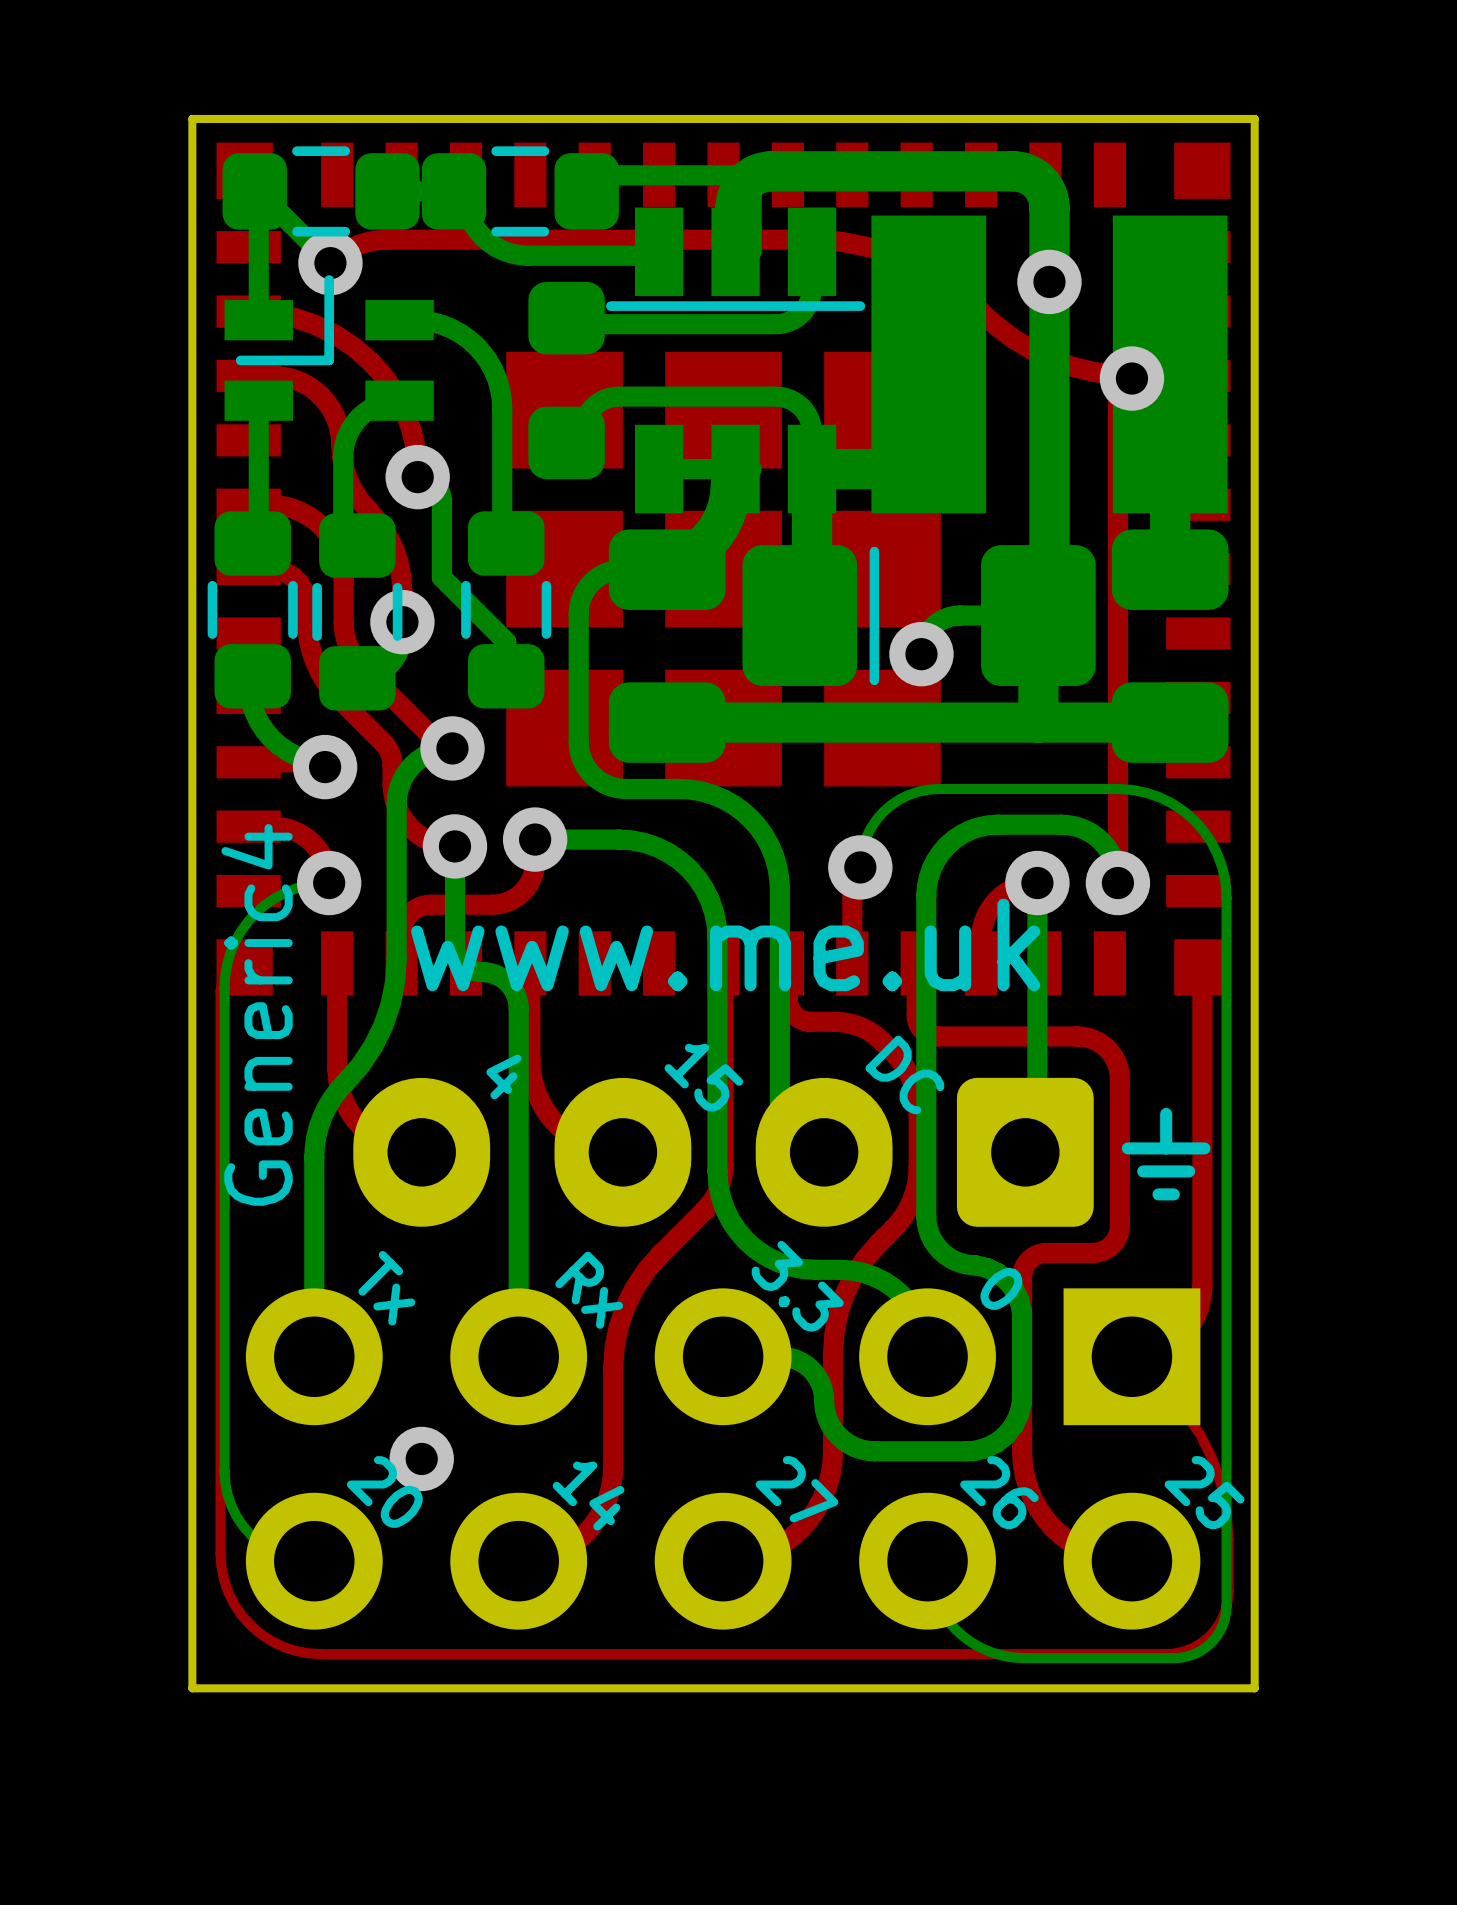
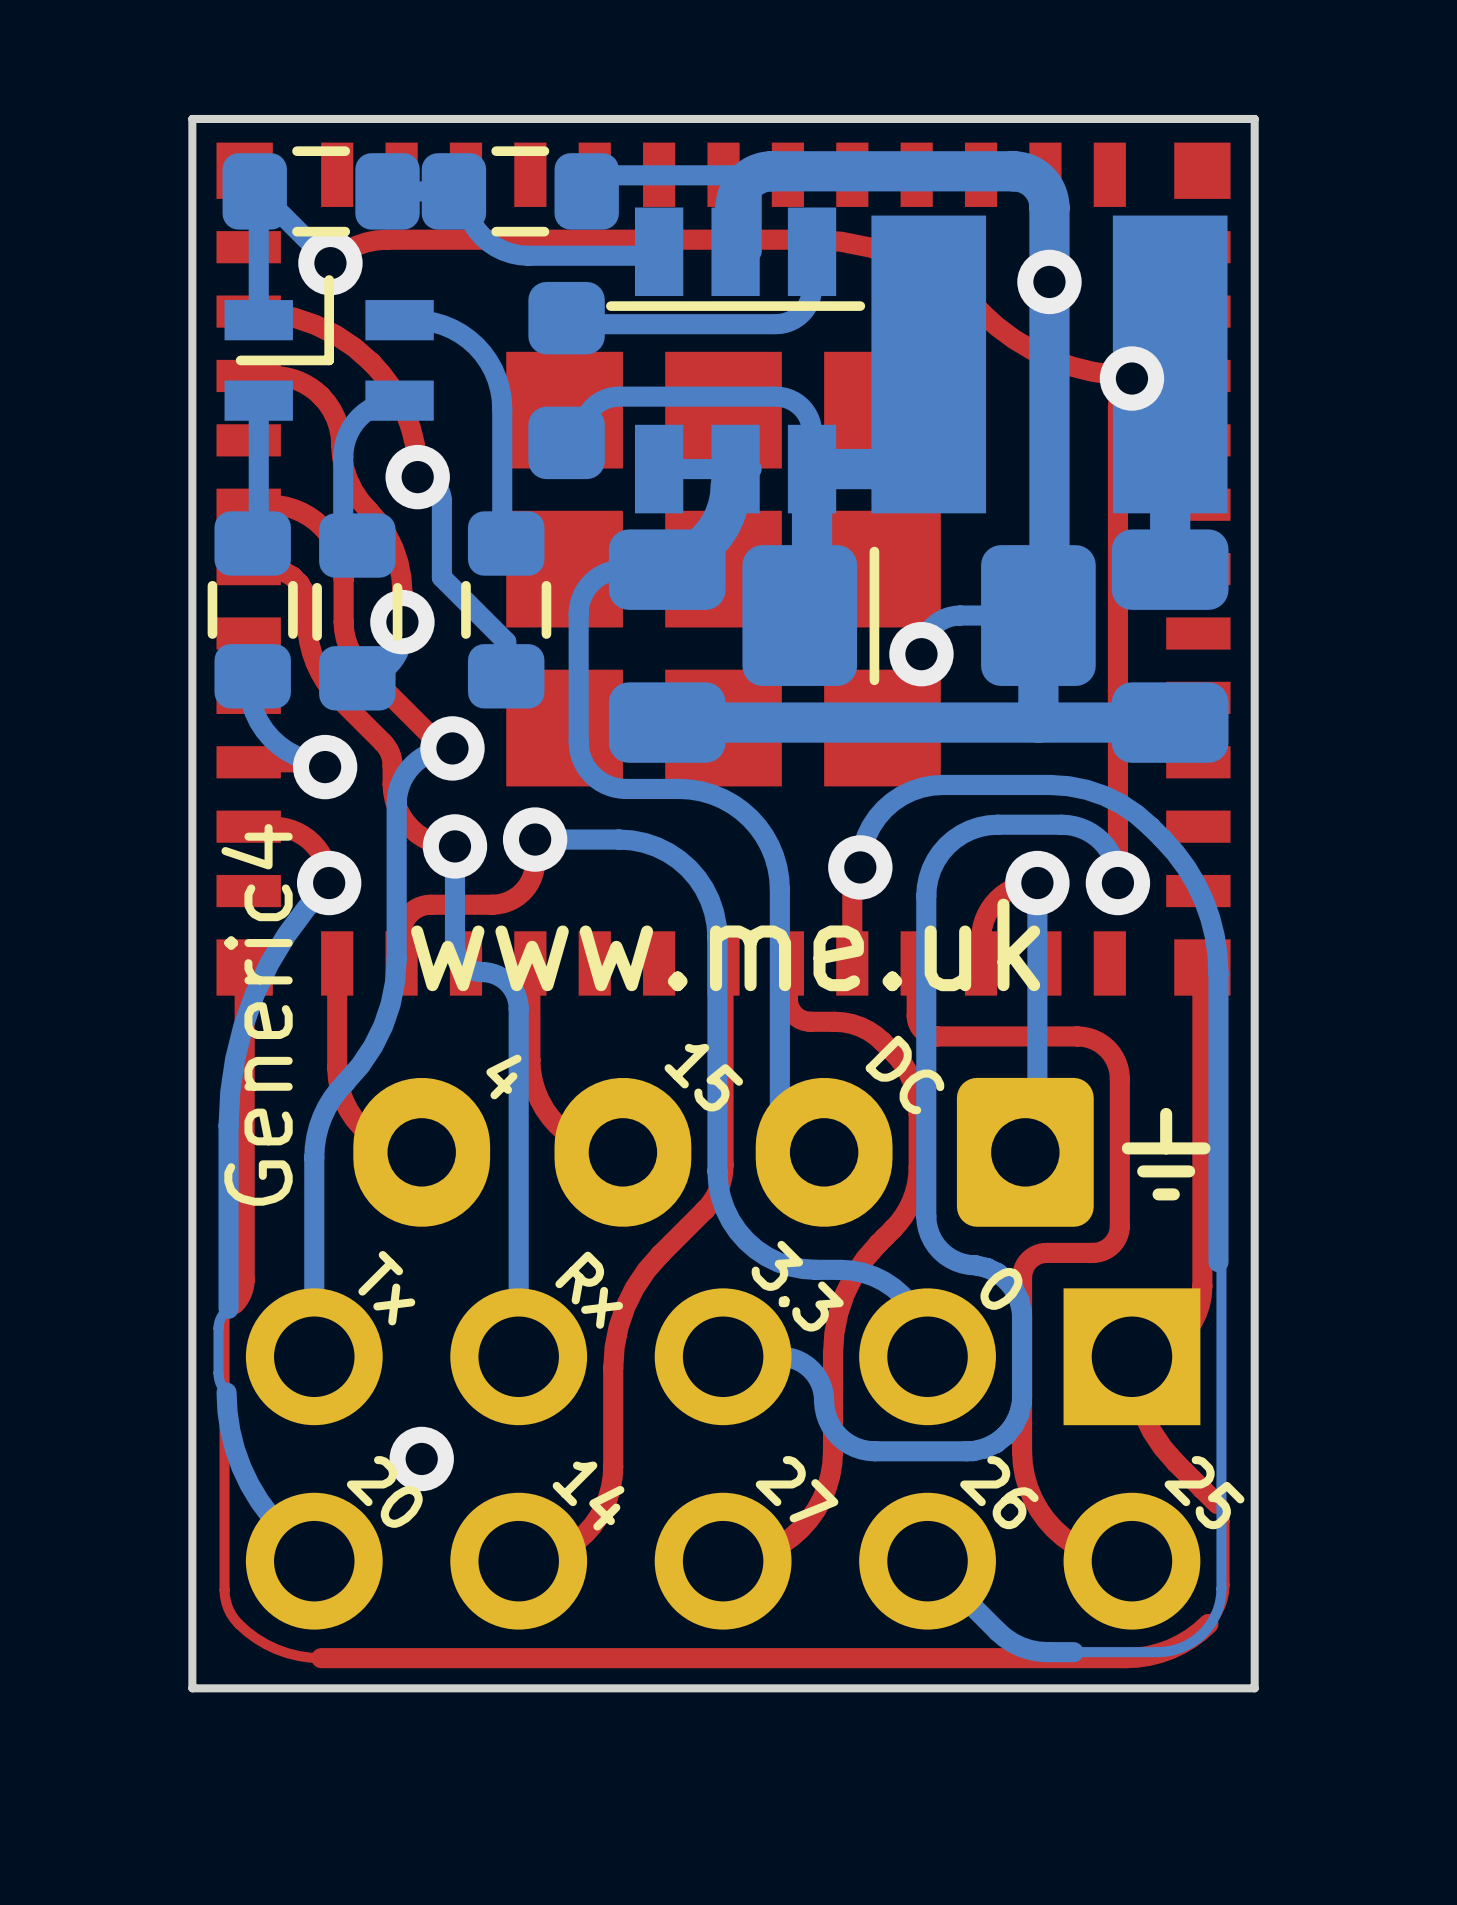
bottom track: (860, 867) (866, 837) (876, 819) (891, 805) (918, 791) (938, 788) (1117, 788) (1146, 792) (1172, 803) (1184, 811) (1194, 820) (1211, 843) (1222, 869) (1225, 883) (1226, 1605) (1222, 1625) (1215, 1637) (1206, 1647) (1194, 1654) (1181, 1657) (1024, 1658) (1002, 1655) (972, 1643) (948, 1621) (932, 1593) (927, 1561) -> (860, 867) (863, 846) (871, 826) (884, 809) (911, 791) (942, 784) (1049, 784) (1086, 789) (1121, 804) (1136, 814) (1175, 852) (1195, 883) (1203, 900) (1210, 918) (1217, 954) (1218, 1262) (1221, 1265) (1221, 1588) (1219, 1602) (1215, 1616) (1207, 1628) (1197, 1638) (1185, 1645) (1172, 1650) (1038, 1651) (1020, 1646) (1004, 1637) (927, 1561)
bottom track: (329, 883) (305, 885) (283, 893) (255, 913) (234, 942) (227, 964) (224, 987) (225, 1483) (231, 1505) (236, 1516) (243, 1526) (259, 1542) (269, 1549) (291, 1558) (314, 1561) -> (329, 883) (306, 908) (286, 935) (269, 963) (254, 994) (243, 1026) (235, 1058) (230, 1092) (228, 1125) (228, 1308) (221, 1316) (218, 1328) (219, 1378) (226, 1392) (230, 1430) (241, 1467) (249, 1484) (270, 1516) (314, 1561)
top track: (244, 967) (235, 969) (227, 974) (222, 982) (220, 991) (220, 1553) (223, 1579) (234, 1603) (241, 1614) (259, 1633) (282, 1646) (295, 1650) (321, 1654) (1165, 1654) (1186, 1650) (1199, 1644) (1210, 1635) (1218, 1624) (1225, 1611) (1228, 1591) (1226, 1512) (1221, 1485) (1212, 1459) (1200, 1435) (1185, 1412) (1131, 1356) -> (244, 967) (244, 1279) (240, 1296) (234, 1304) (227, 1306) (224, 1314) (224, 1589) (226, 1602) (234, 1619) (256, 1638) (276, 1649) (298, 1655) (321, 1658) (1125, 1658) (1159, 1653) (1180, 1644) (1199, 1631) (1213, 1618) (1220, 1606) (1224, 1585) (1224, 1518) (1219, 1505) (1175, 1462) (1152, 1431) (1137, 1395) (1131, 1356)

